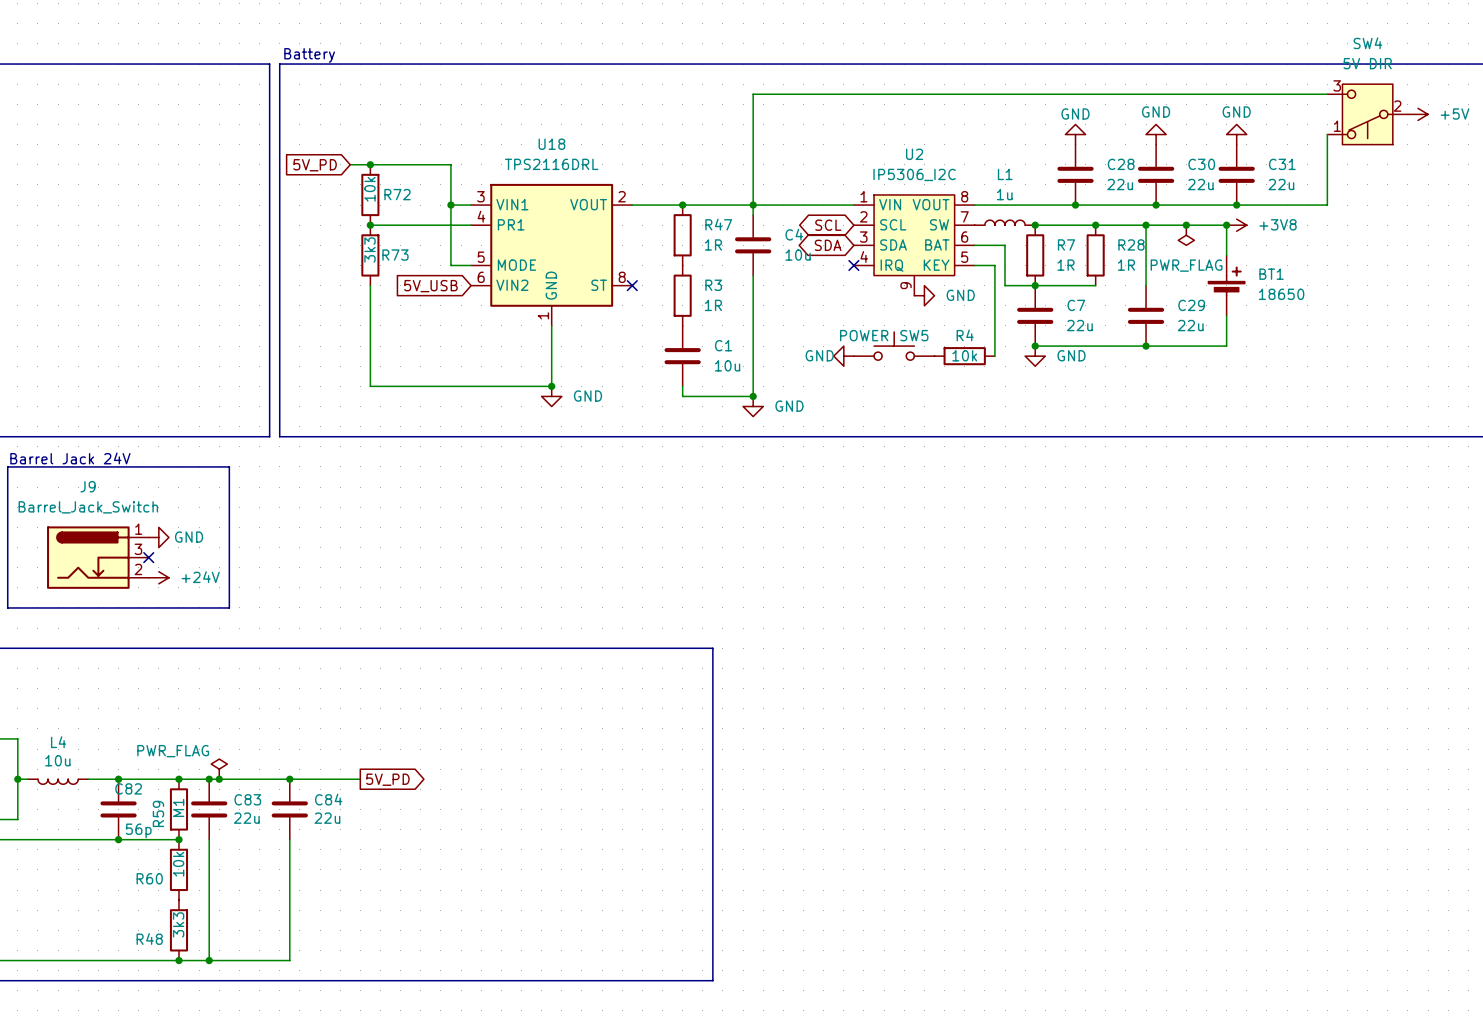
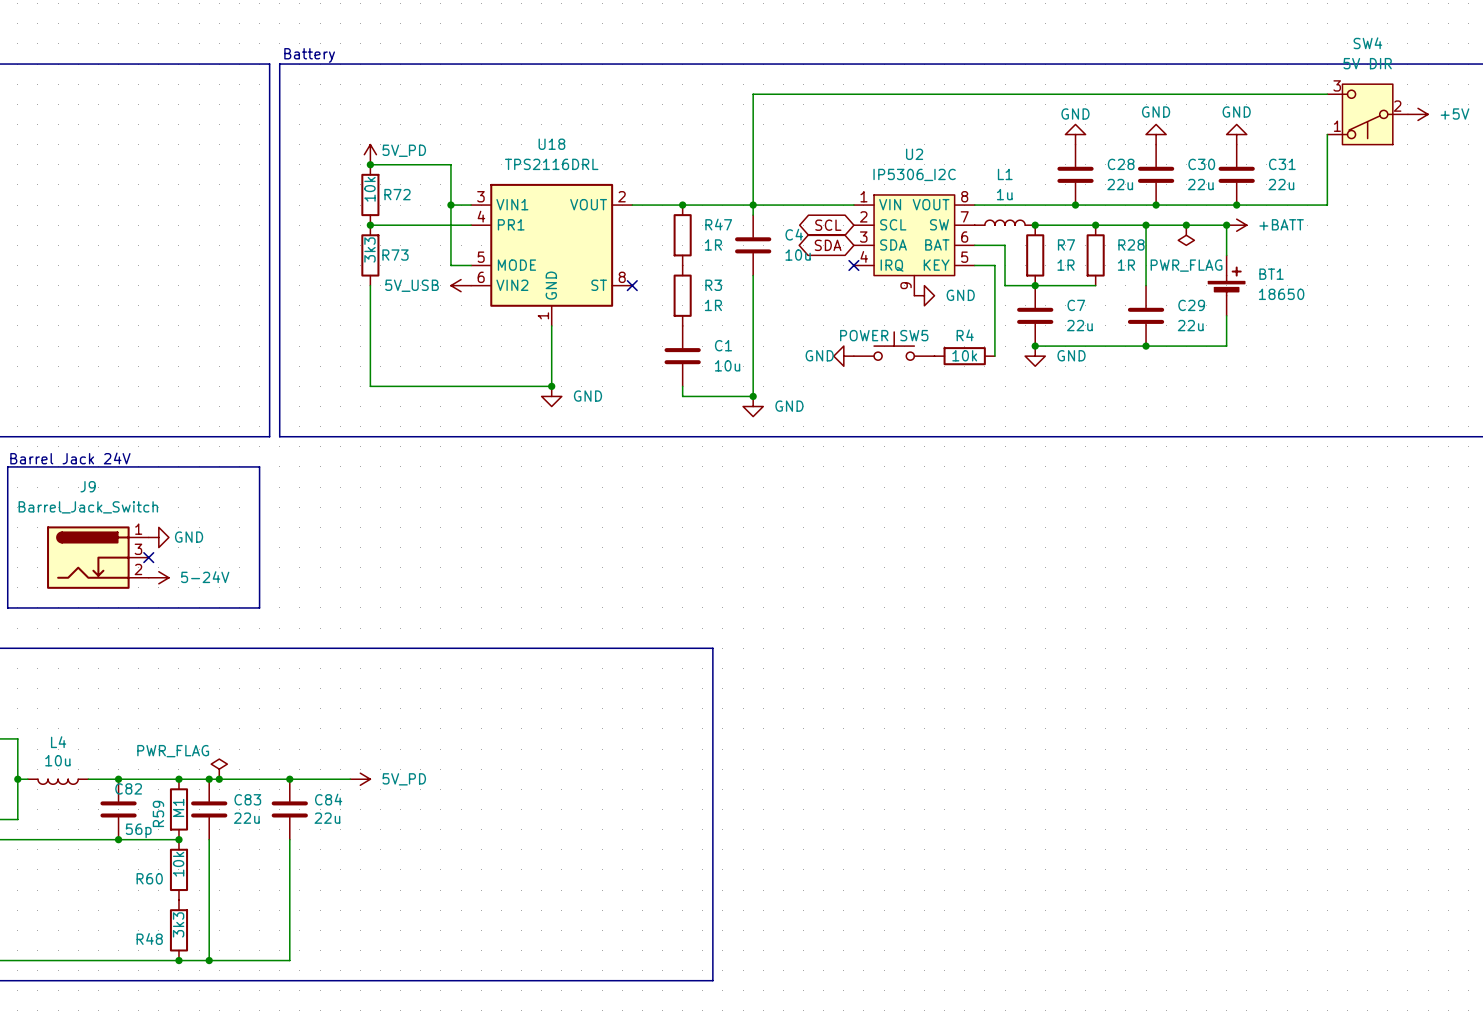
power symbol: none -> 5V_PD (370, 154)
wire: (350, 164) (370, 164) -> none
global label: 5V_PD (315, 165) -> none
power symbol: +3V8 (1236, 225) -> +BATT (1236, 225)
power symbol: none -> 5V_USB (461, 285)
global label: 5V_USB (430, 286) -> none
line: (229, 466) (229, 607) -> (229, 466) (259, 466) (259, 607) (229, 607)
power symbol: +24V (158, 577) -> 5-24V (158, 577)
power symbol: none -> 5V_PD (360, 779)
global label: 5V_PD (387, 779) -> none

